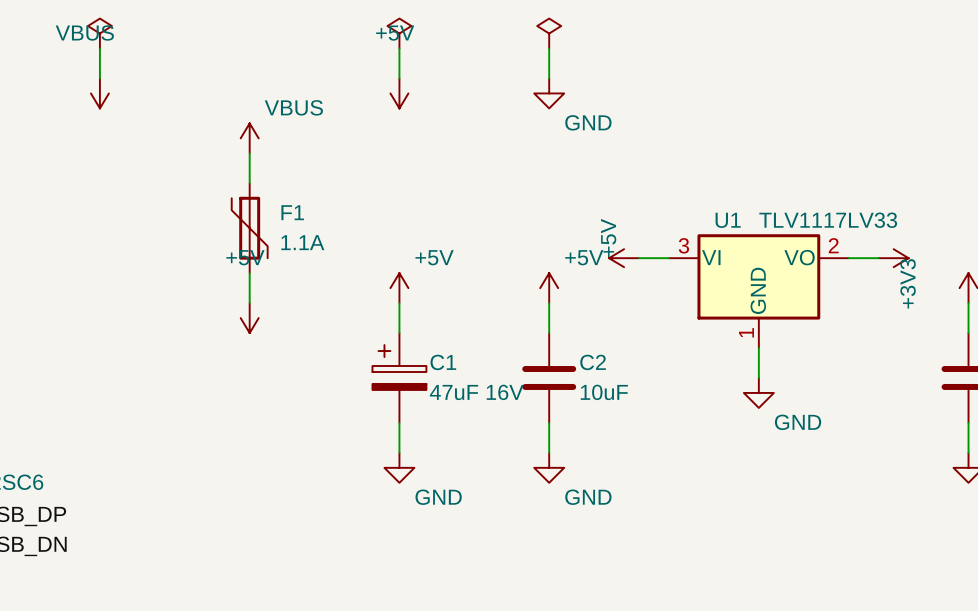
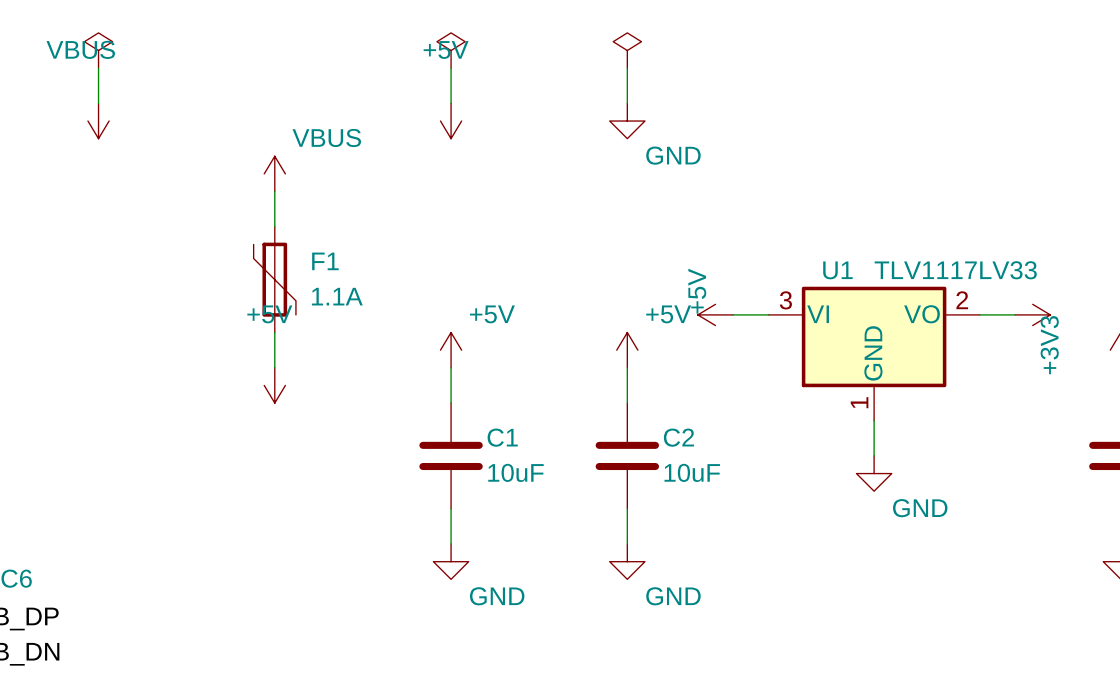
C1 symbol: [372, 333, 427, 423] -> [419, 403, 483, 509]
C1 value: 47uF 16V (476, 392) -> 10uF (515, 472)

